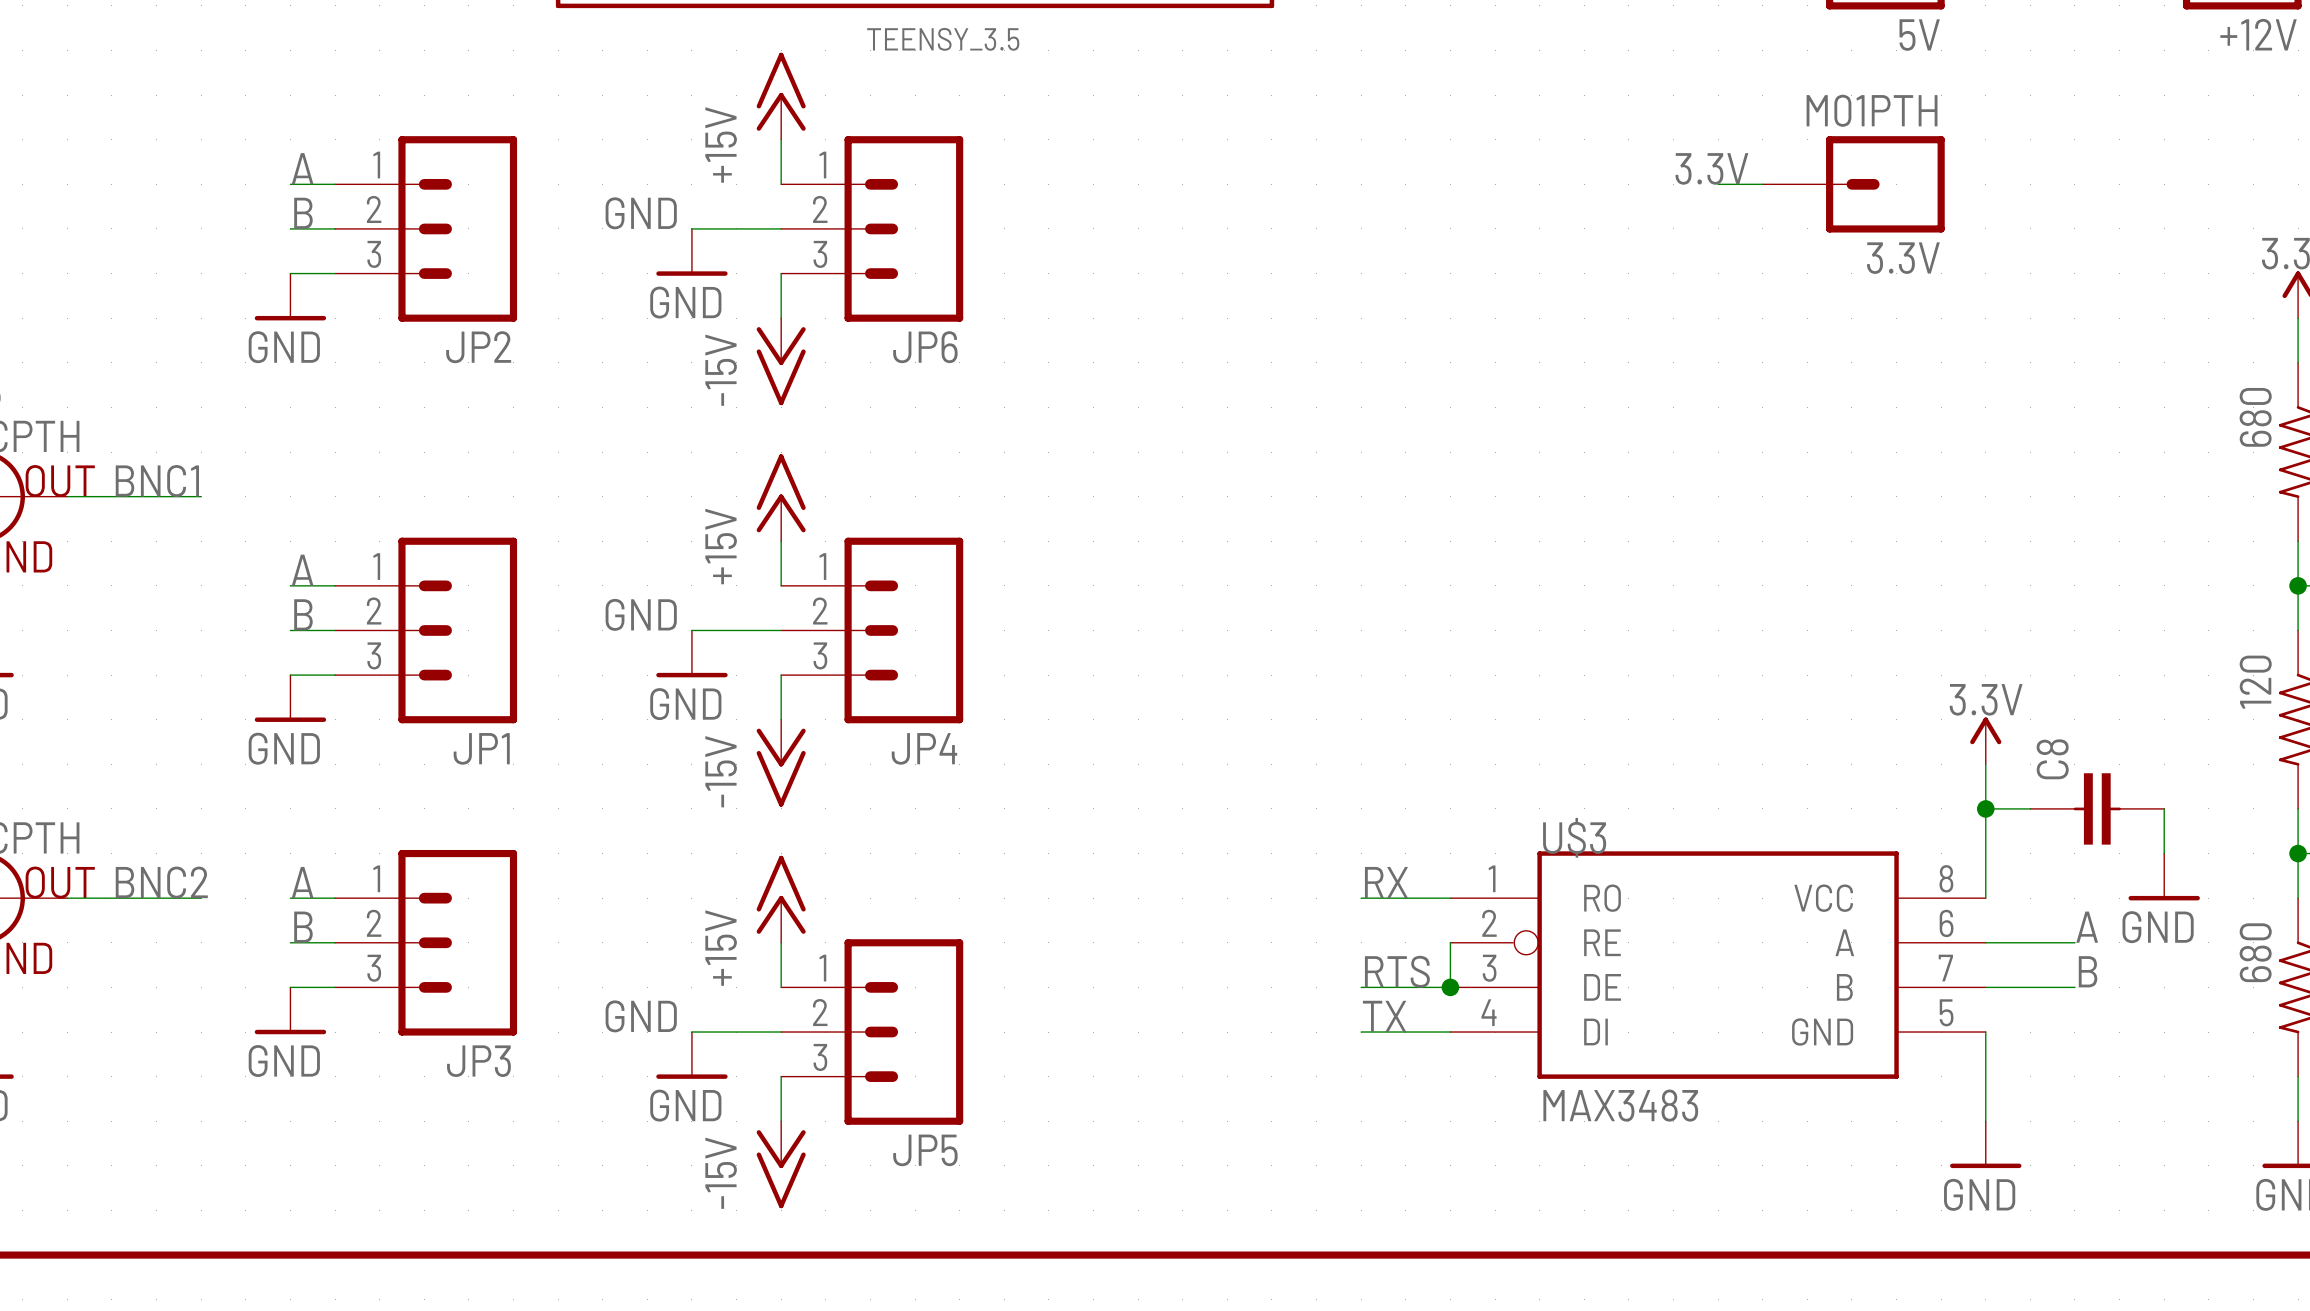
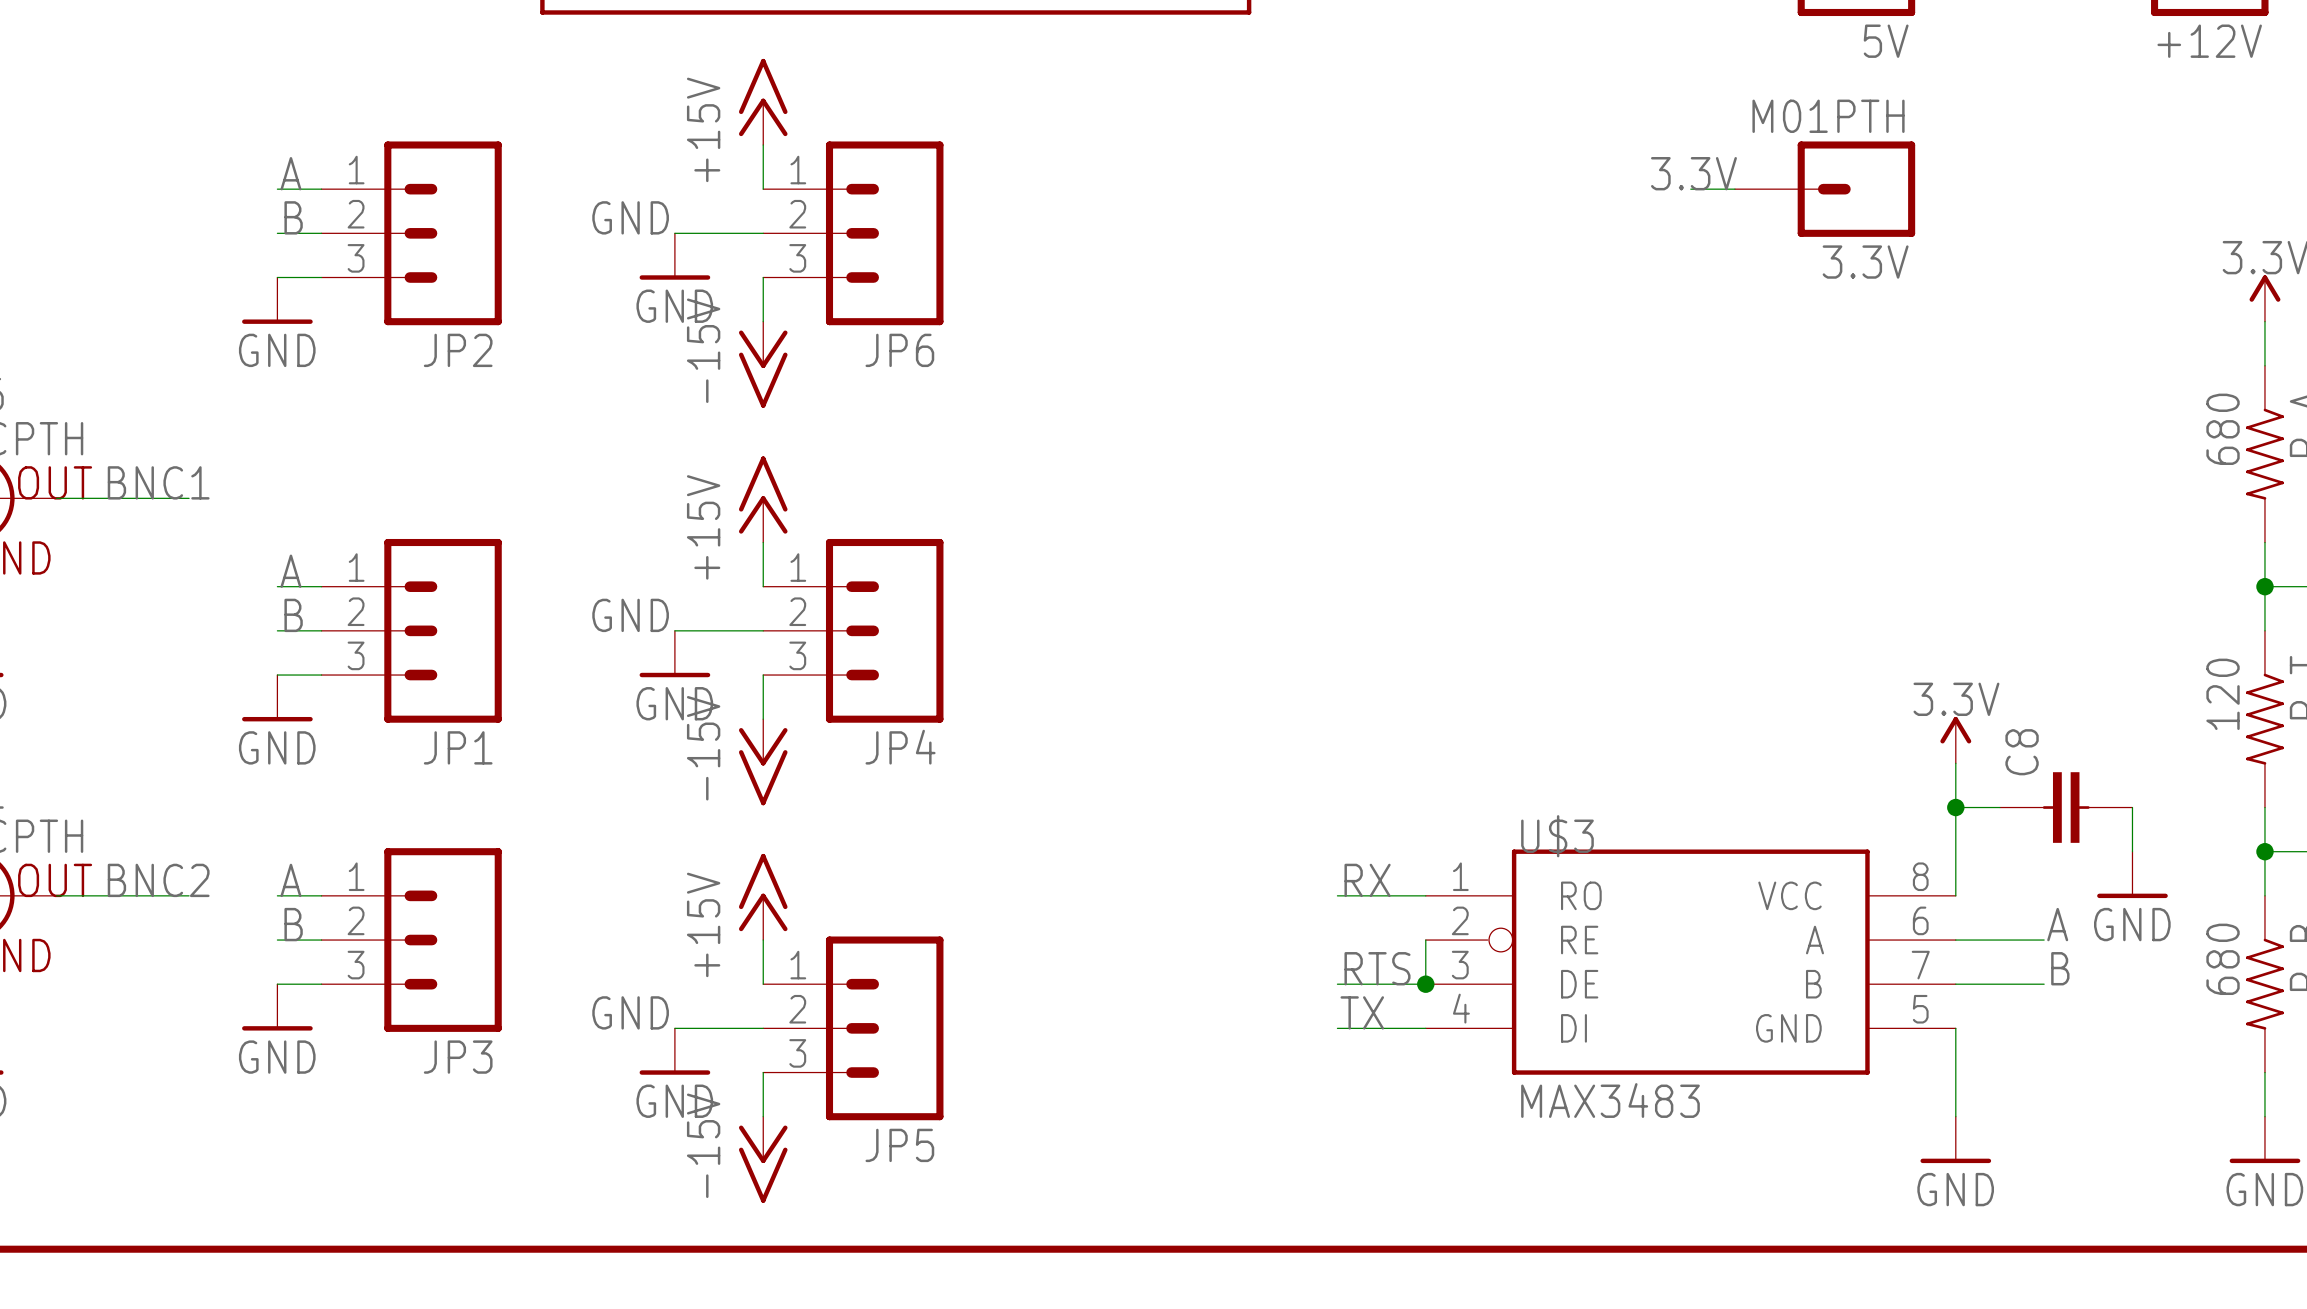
part value: TEENSY_3.5 (943, 39) -> none

